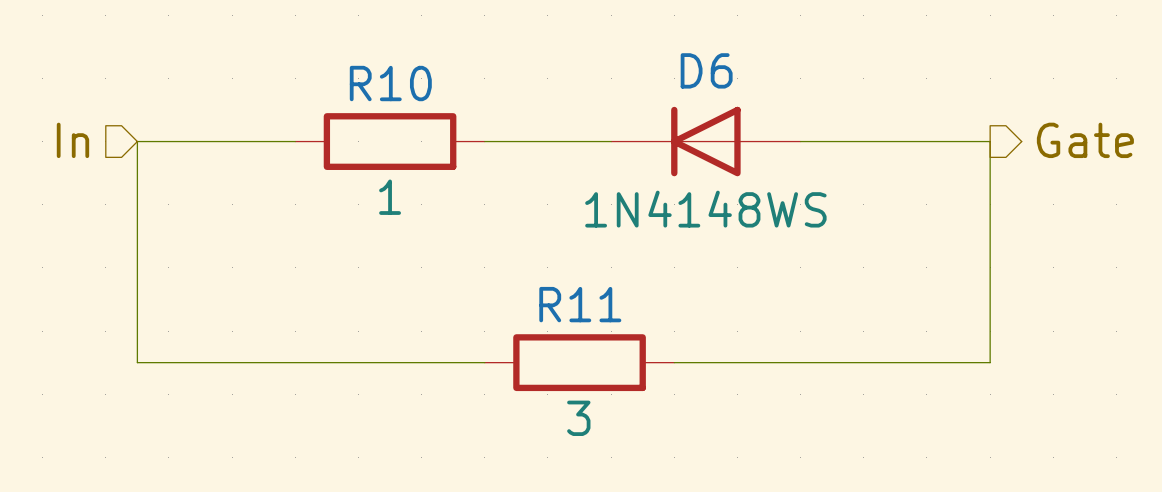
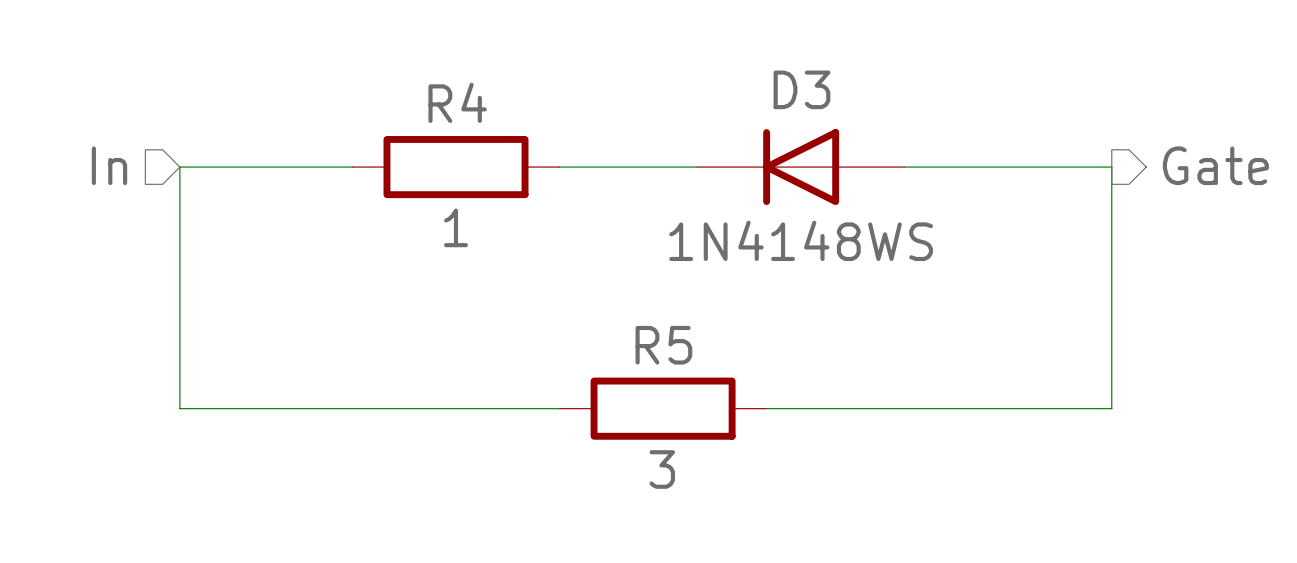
D6 name: D6 (706, 70) -> D3 (801, 89)
R10 name: R10 (390, 83) -> R4 (457, 102)
R11 name: R11 (580, 304) -> R5 (663, 345)

